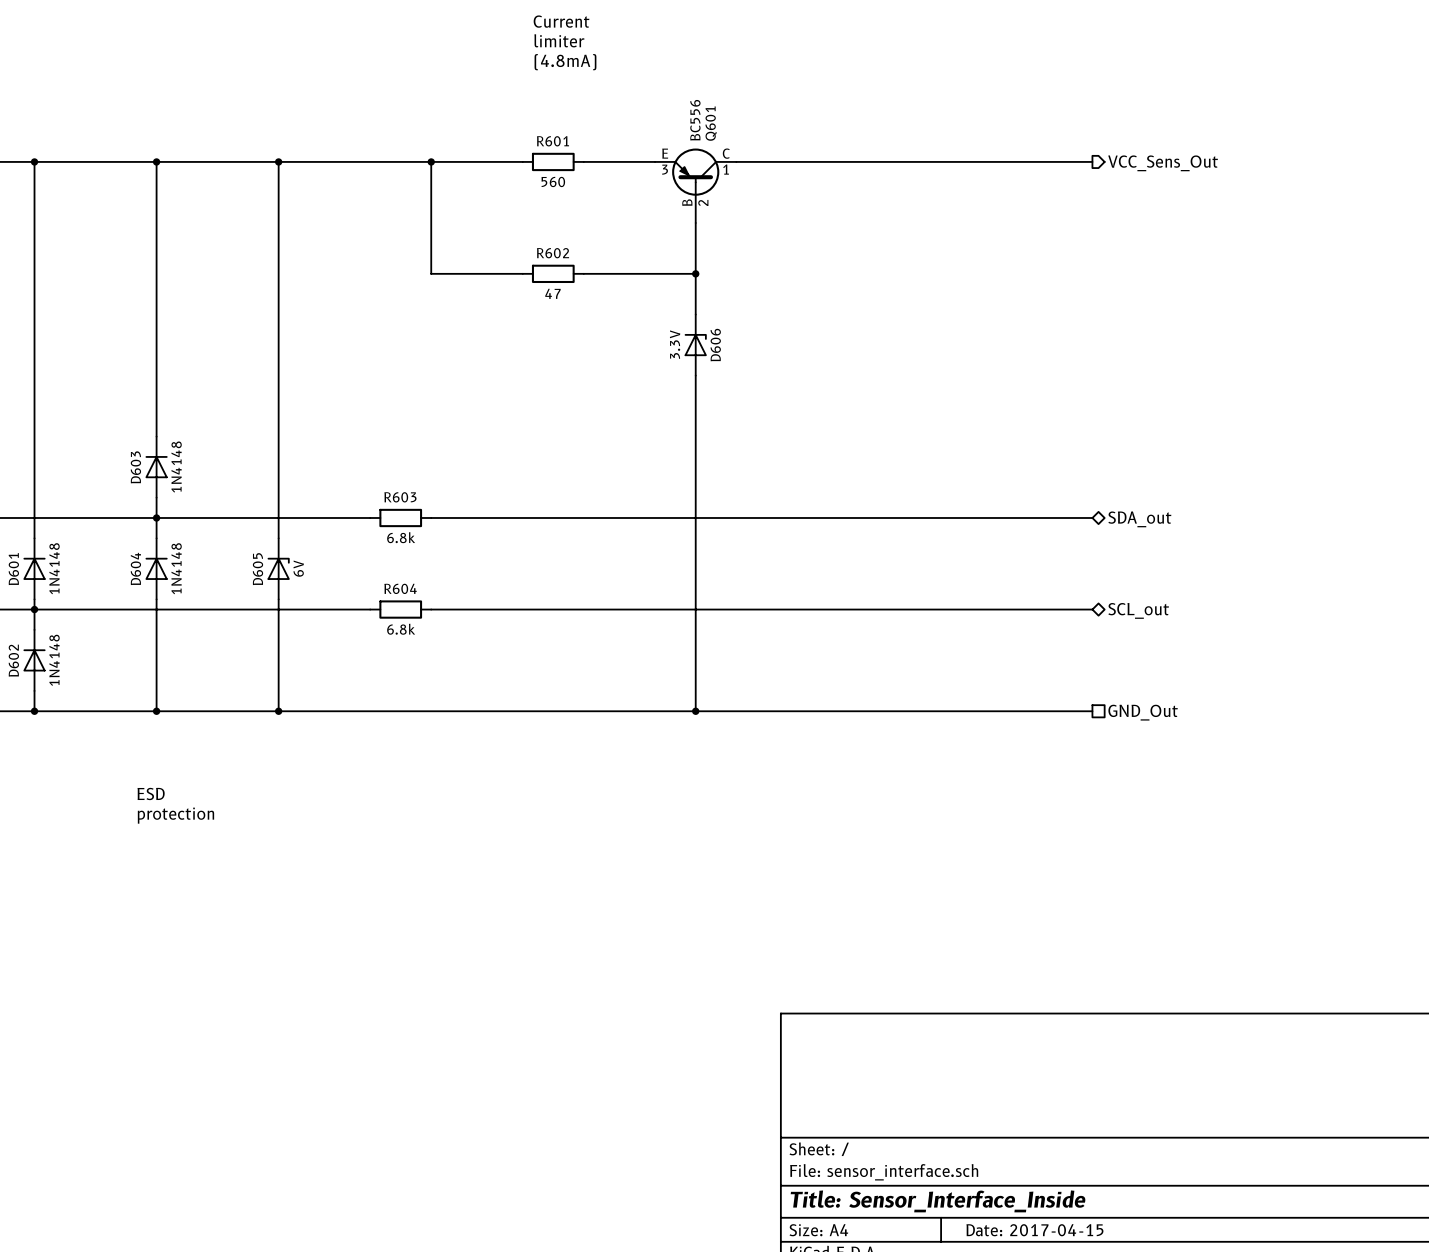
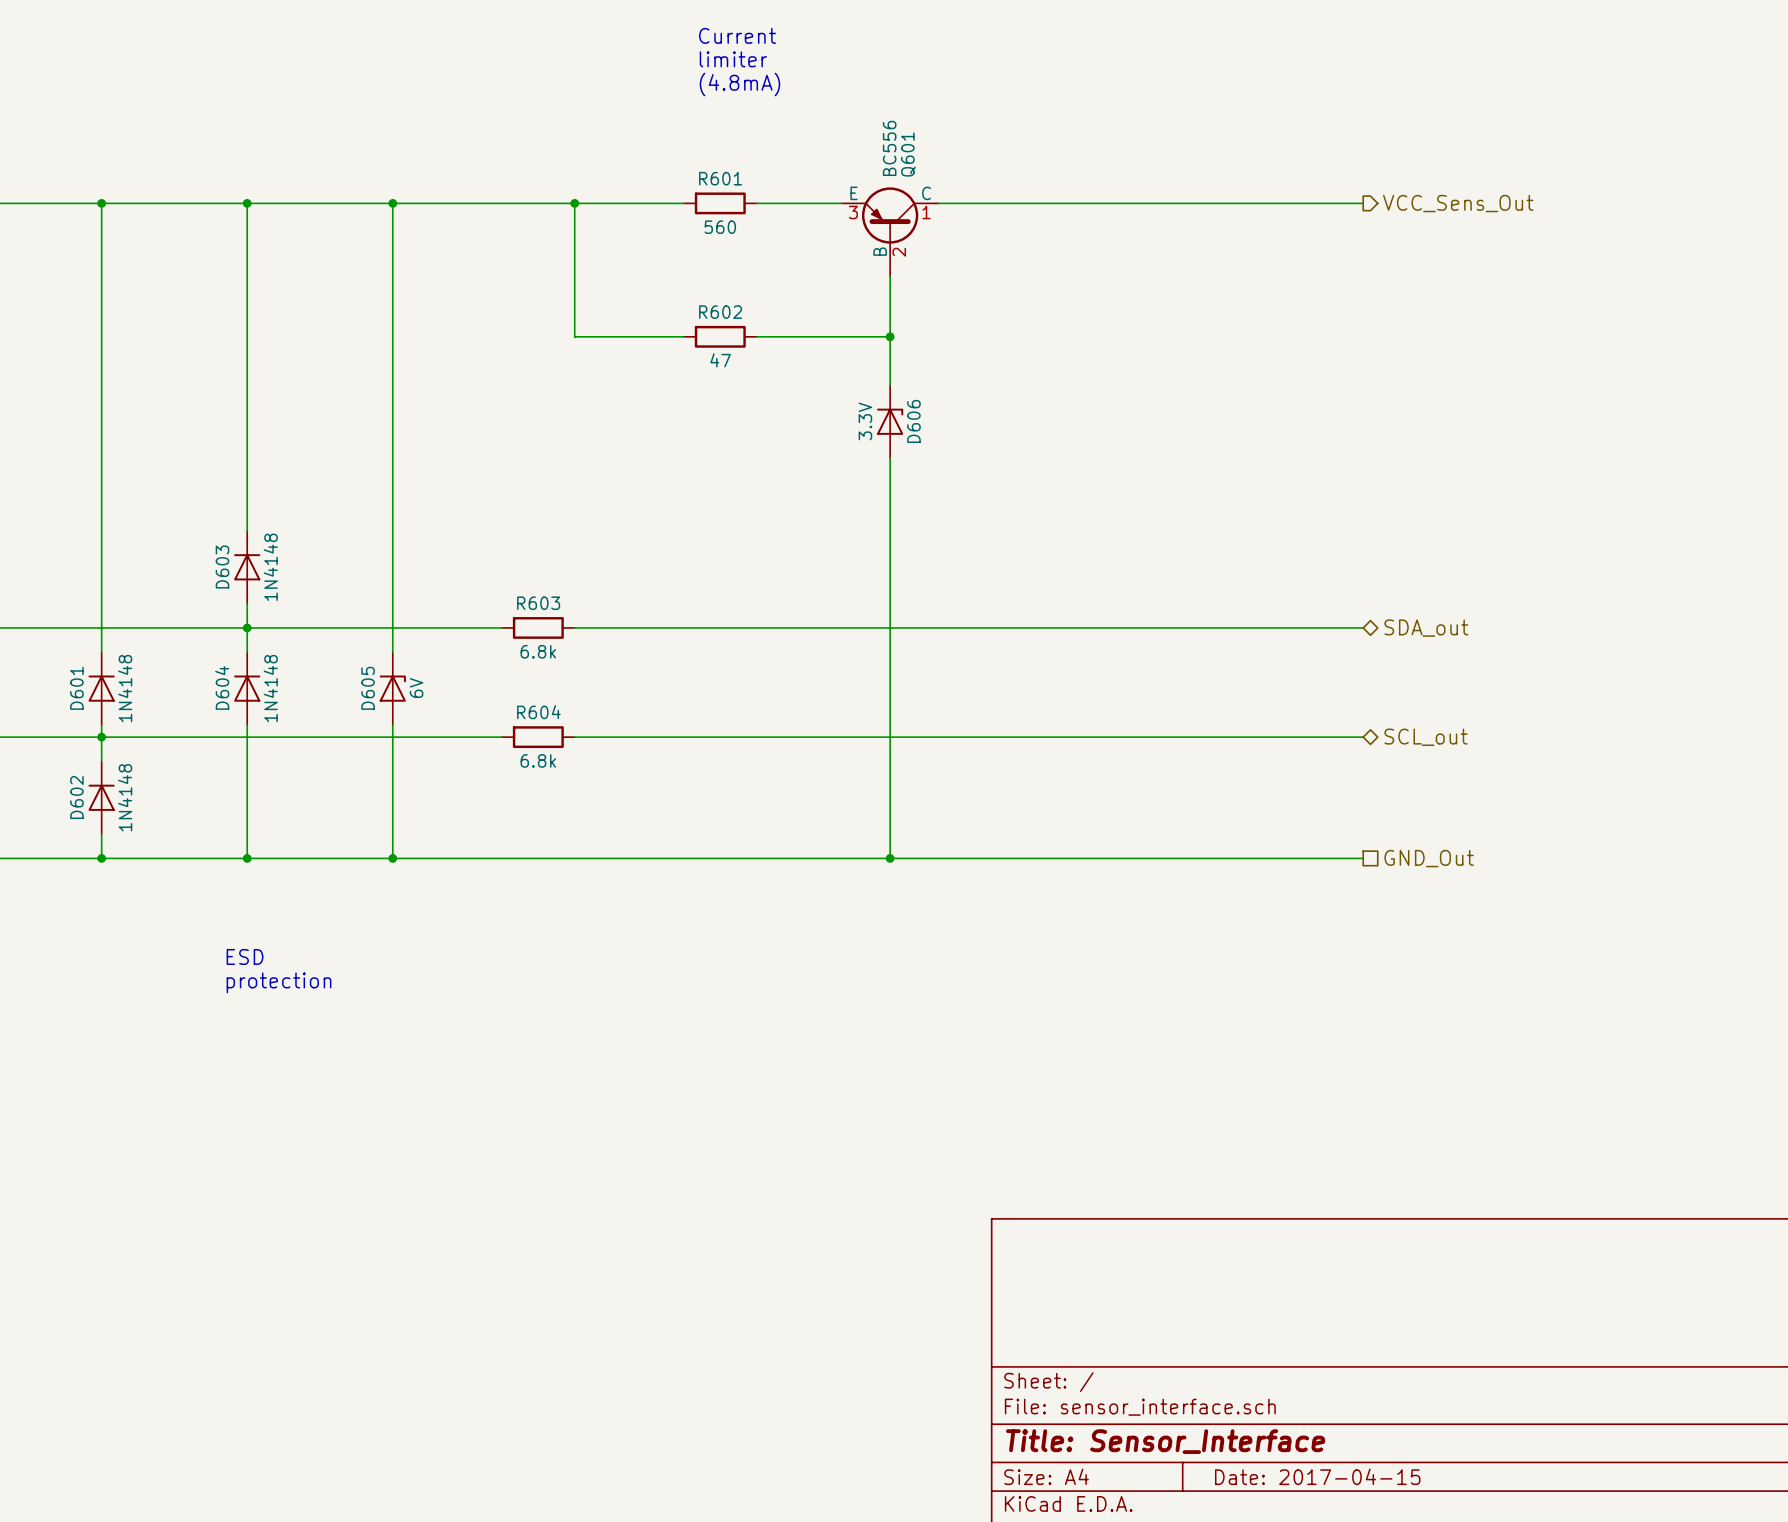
title block: Title: Sensor_Interface_Inside (938, 1201) -> Title: Sensor_Interface (1165, 1441)

